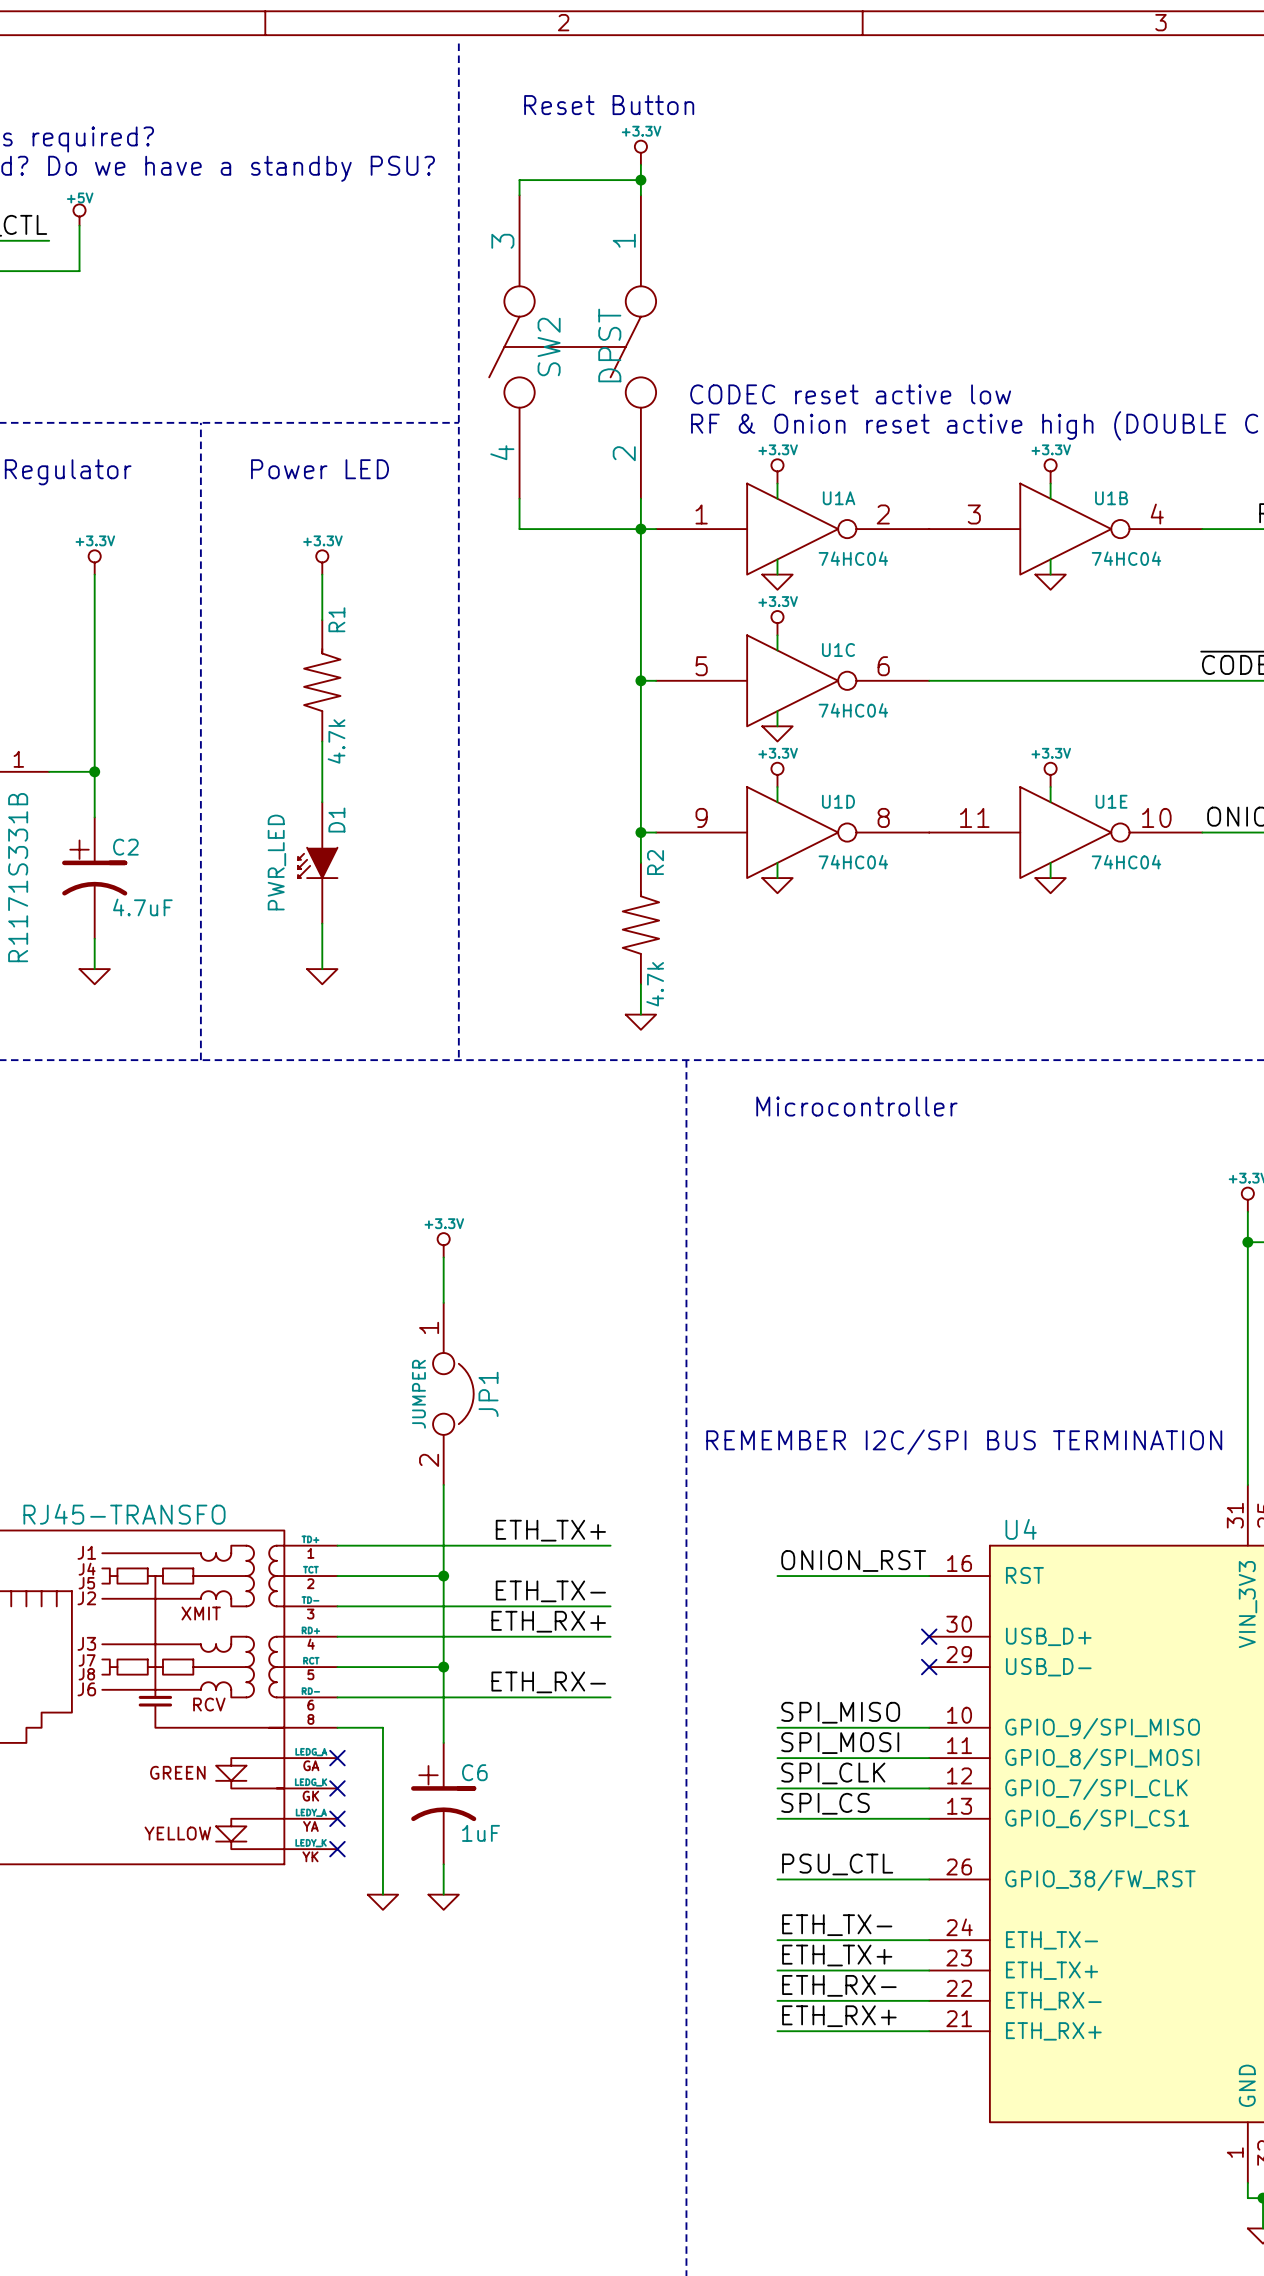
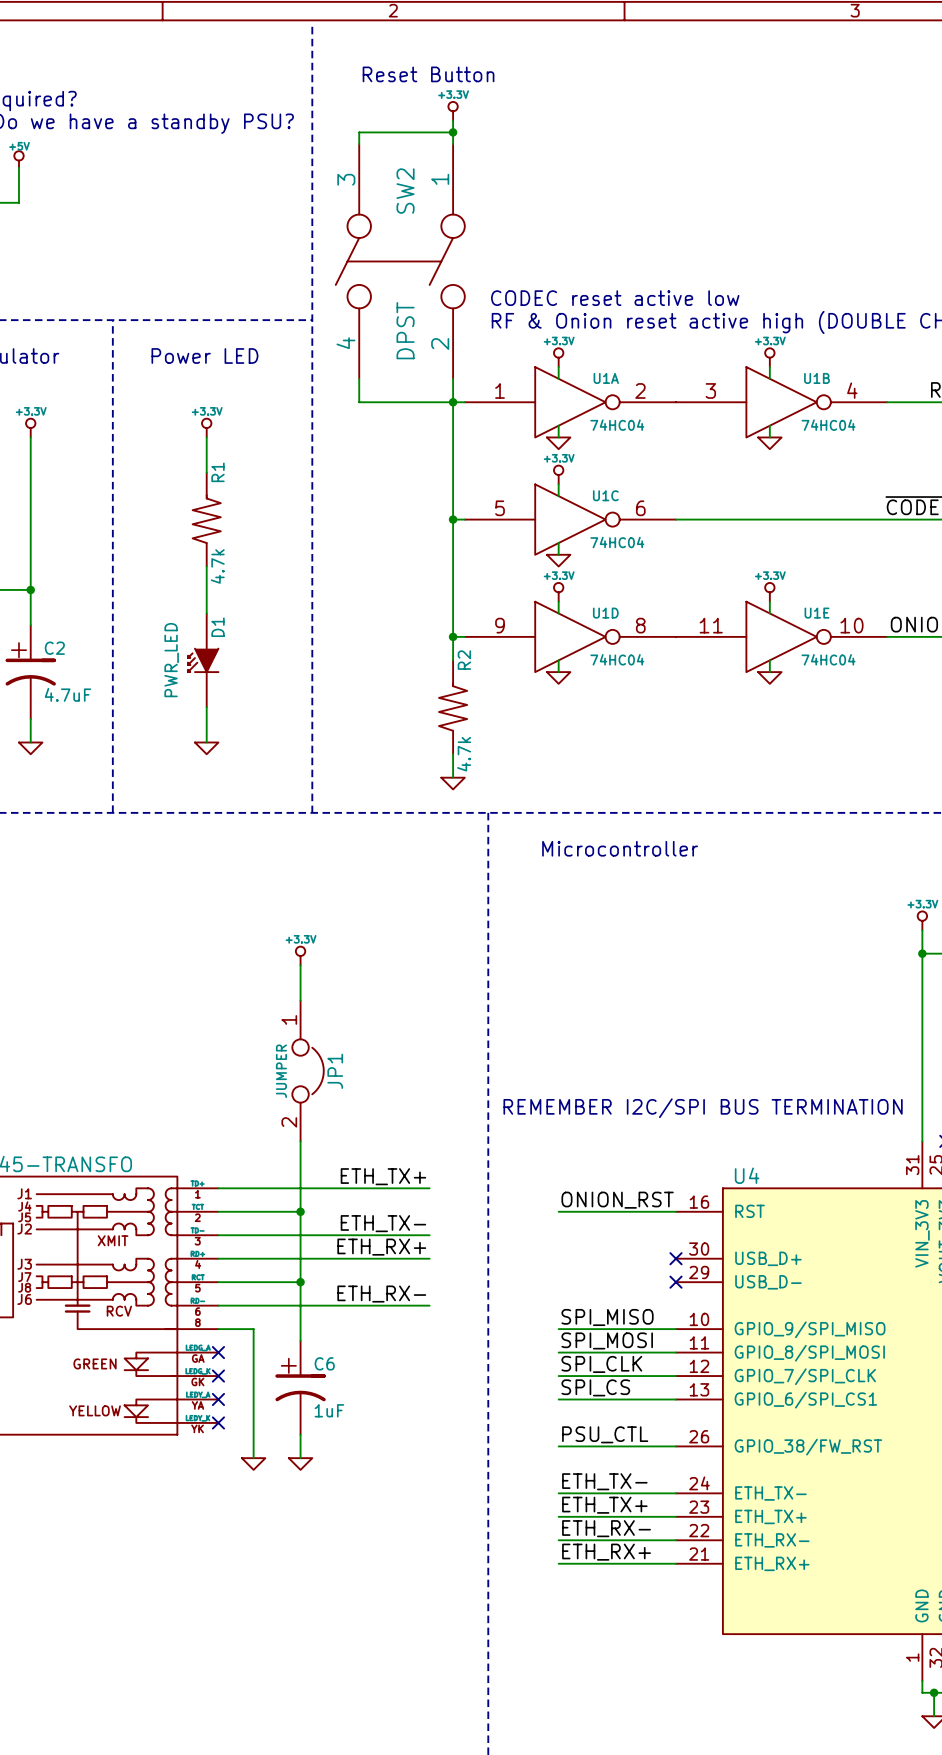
SW2 value position: DPST (609, 345) -> DPST (405, 330)
SW2 name position: SW2 (549, 346) -> SW2 (405, 191)

